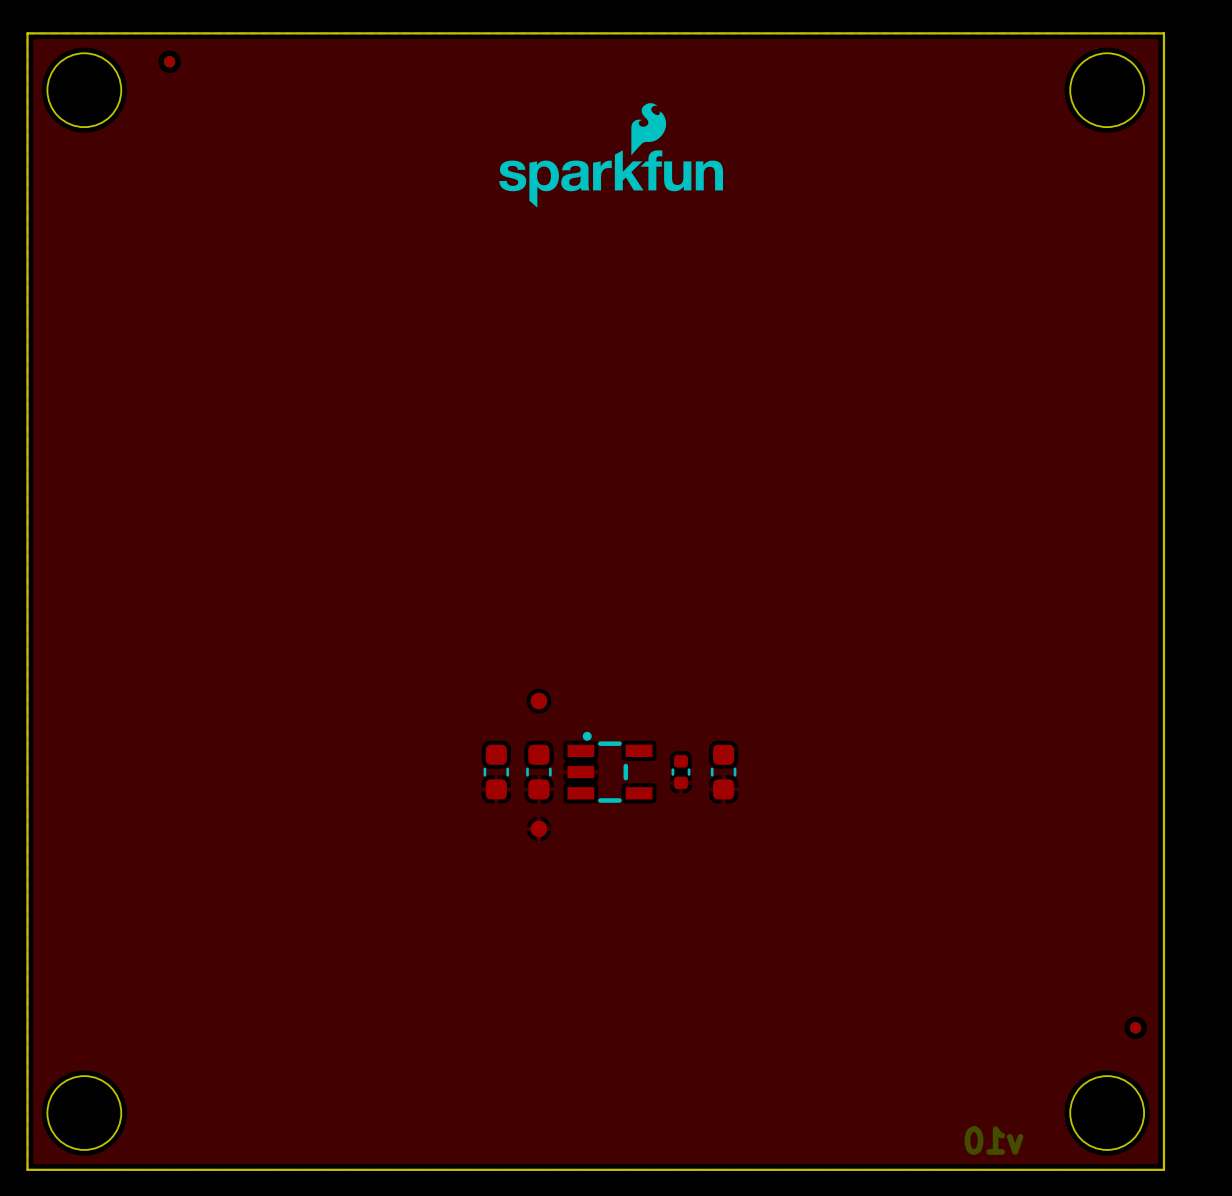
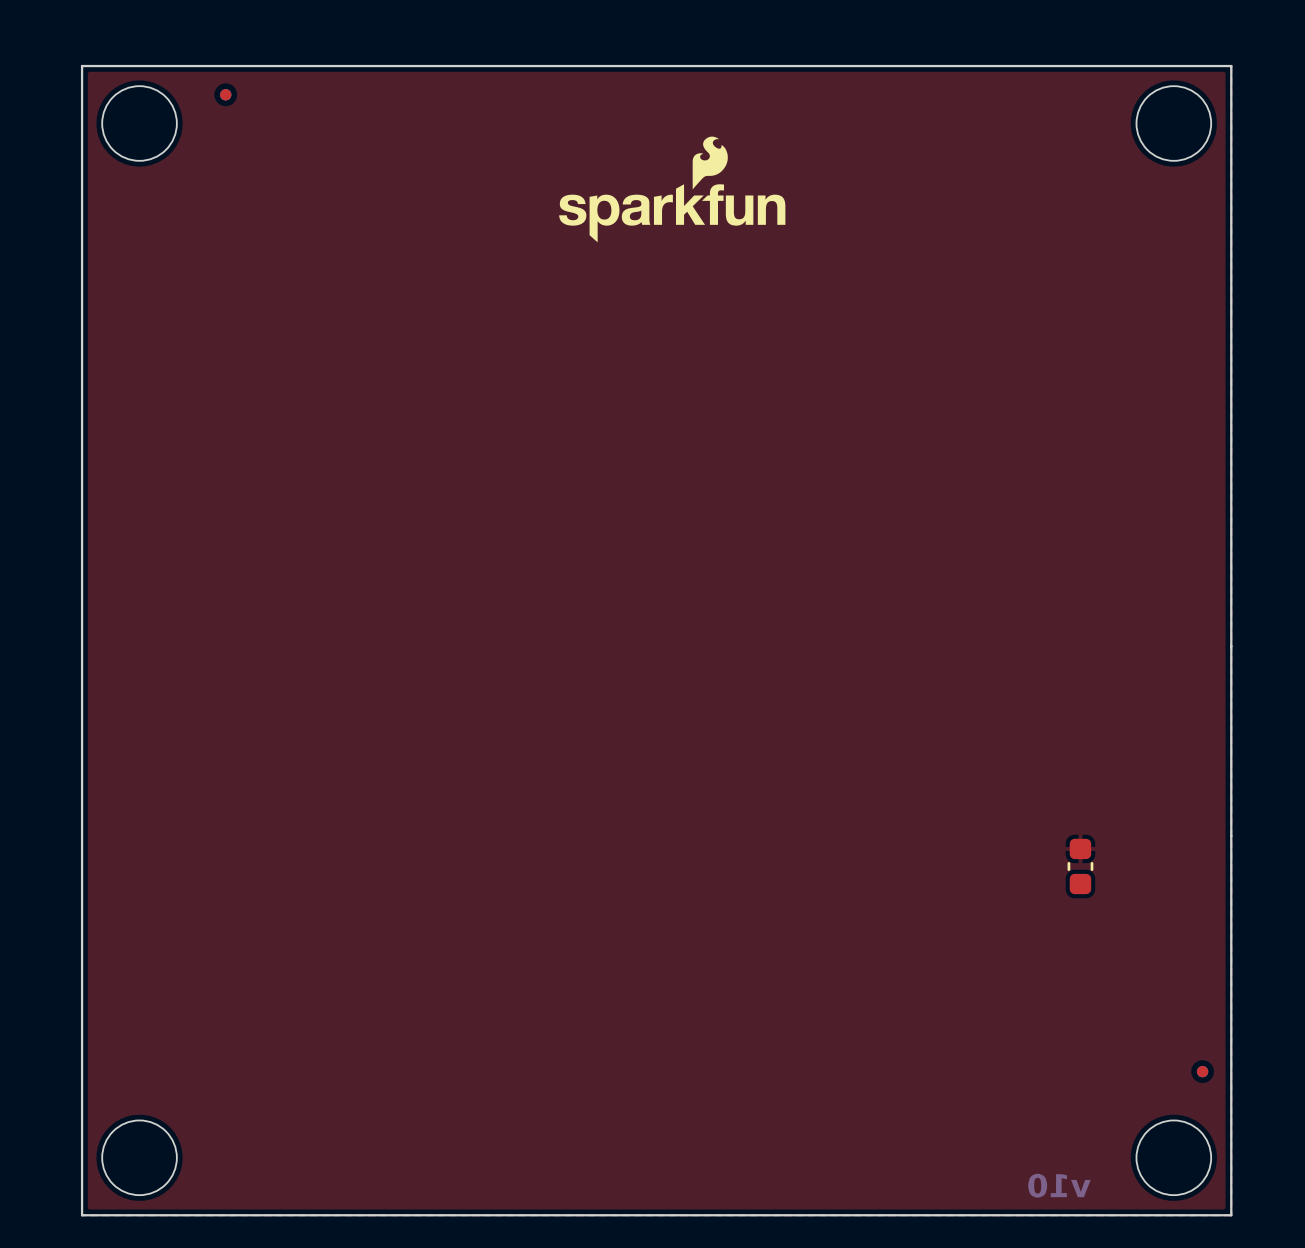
part: (538, 701) -> none
part: (609, 767) -> none
part: (496, 772) -> none
part: (538, 772) -> none
part: (680, 772) -> none
part: (723, 772) -> none
part: none -> (1080, 866)
part: (538, 828) -> none

